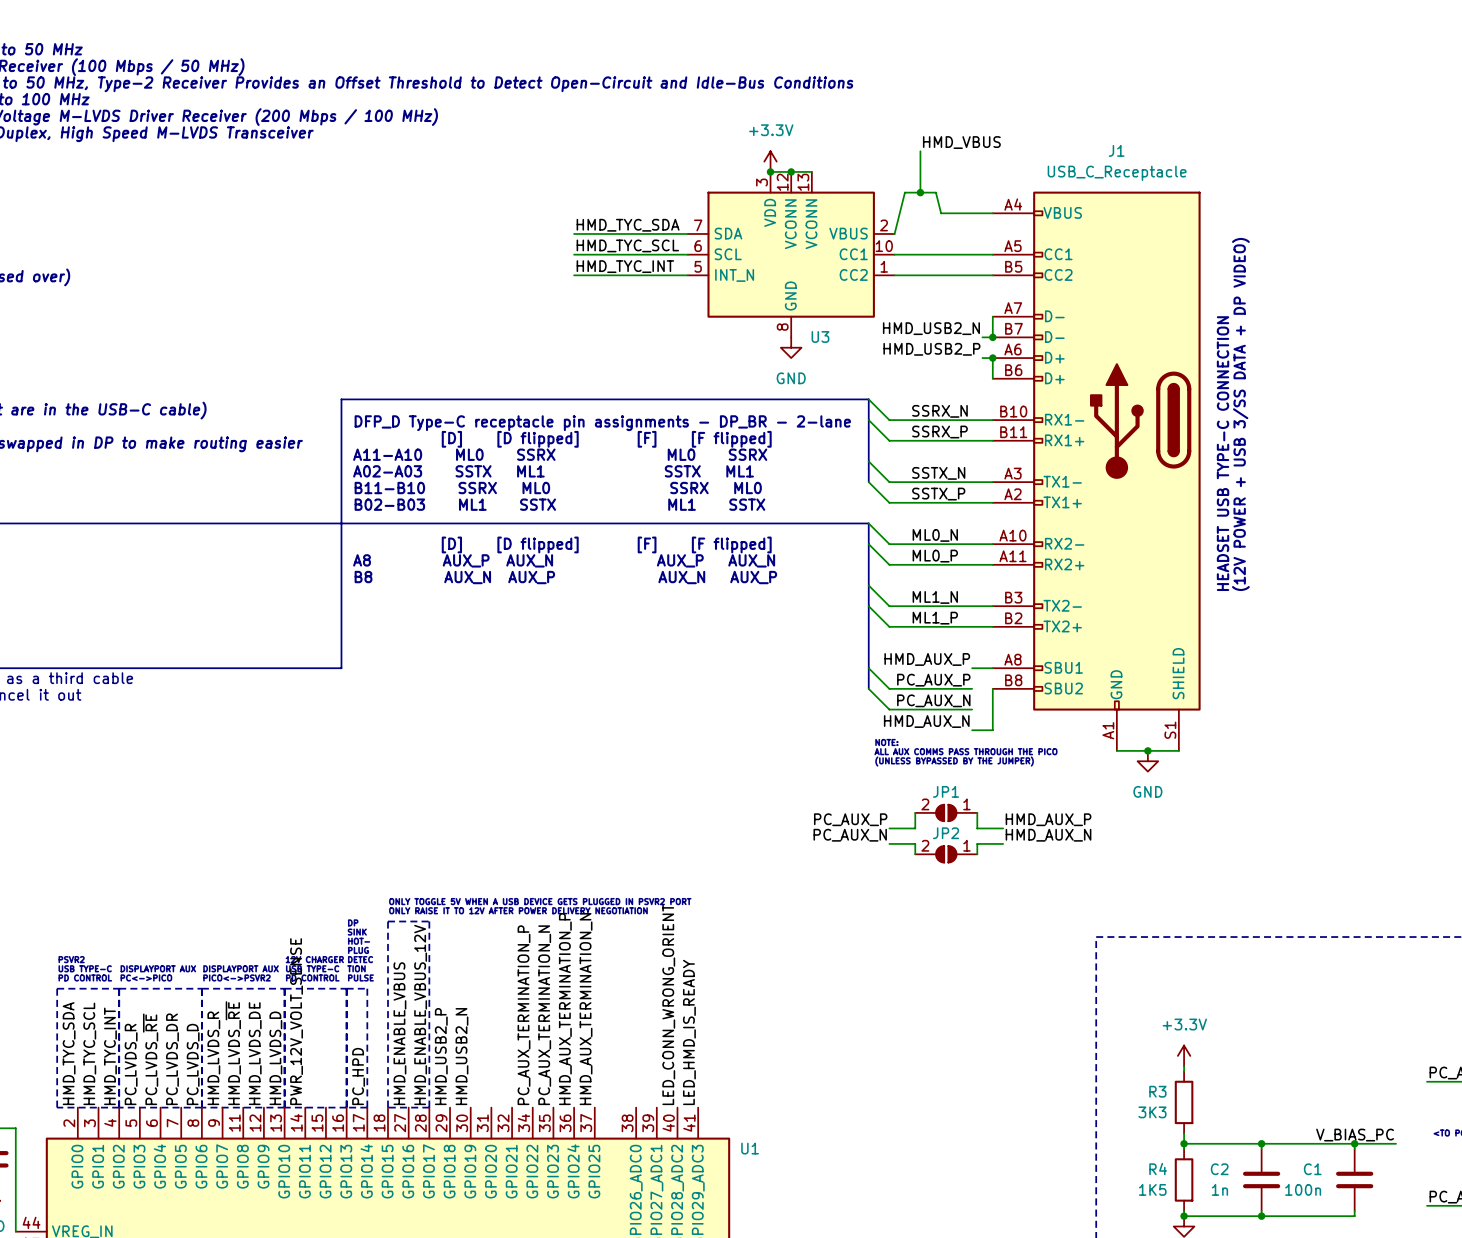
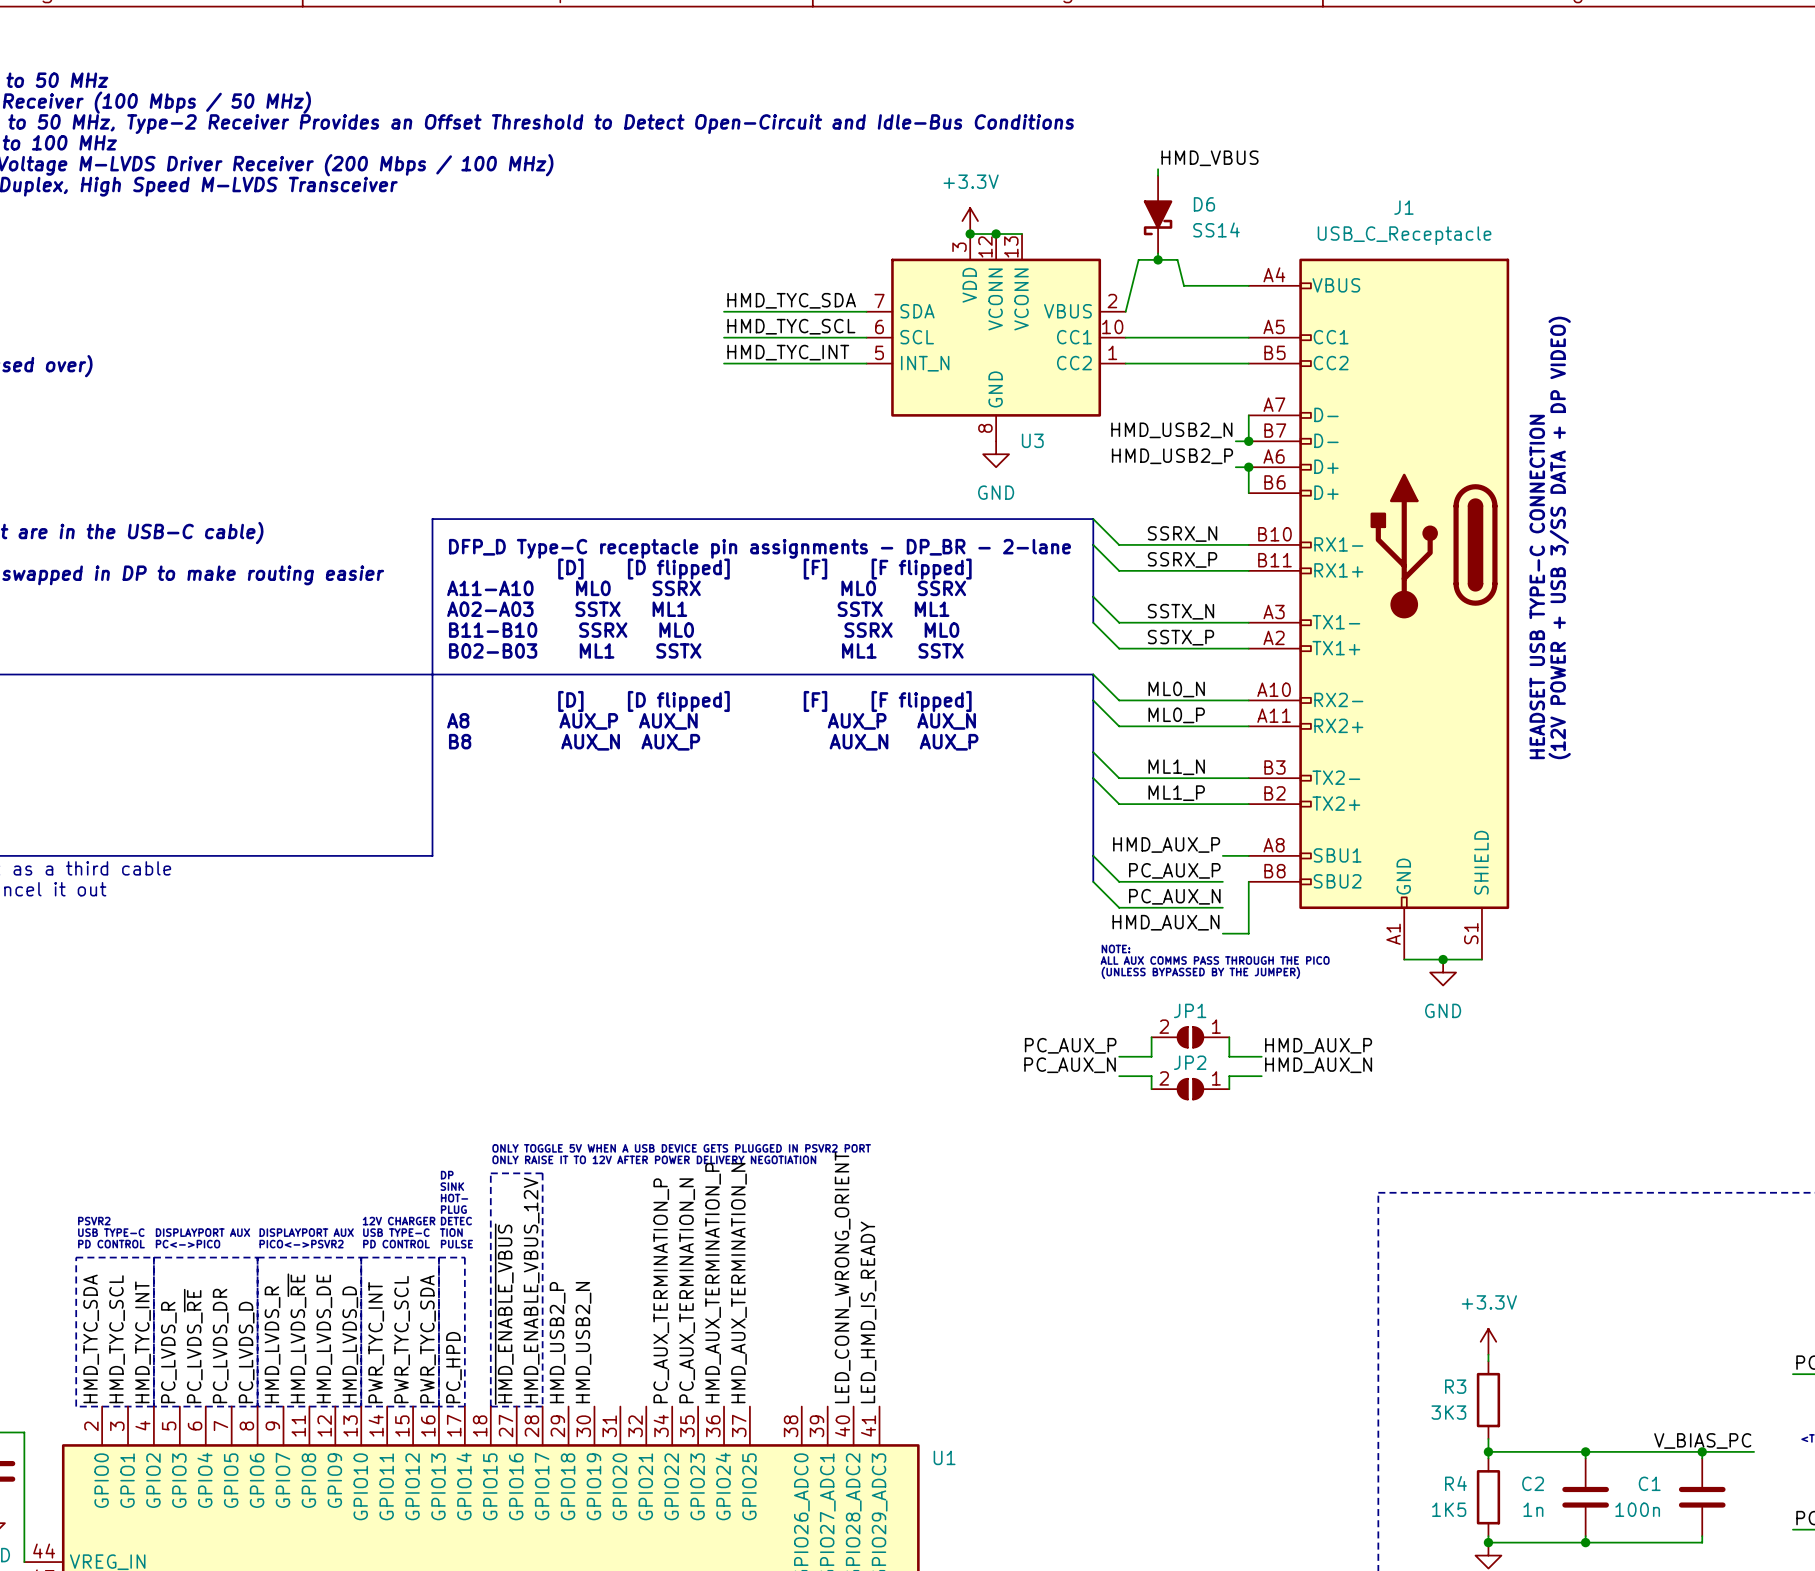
wire: none -> (1158, 169) (1158, 175)
label position: HMD_VBUS (961, 142) -> HMD_VBUS (1209, 158)
D6: none -> SS14 (1158, 214)
label: PWR_12V_VOLT_SENSE (296, 1021) -> PWR_TYC_INT (376, 1342)
label: HMD_ENABLE_VBUS (399, 1033) -> ~{HMD_ENABLE_VBUS} (504, 1314)
label: none -> PWR_TYC_SDA (428, 1339)
label: none -> PWR_TYC_SCL (402, 1339)

